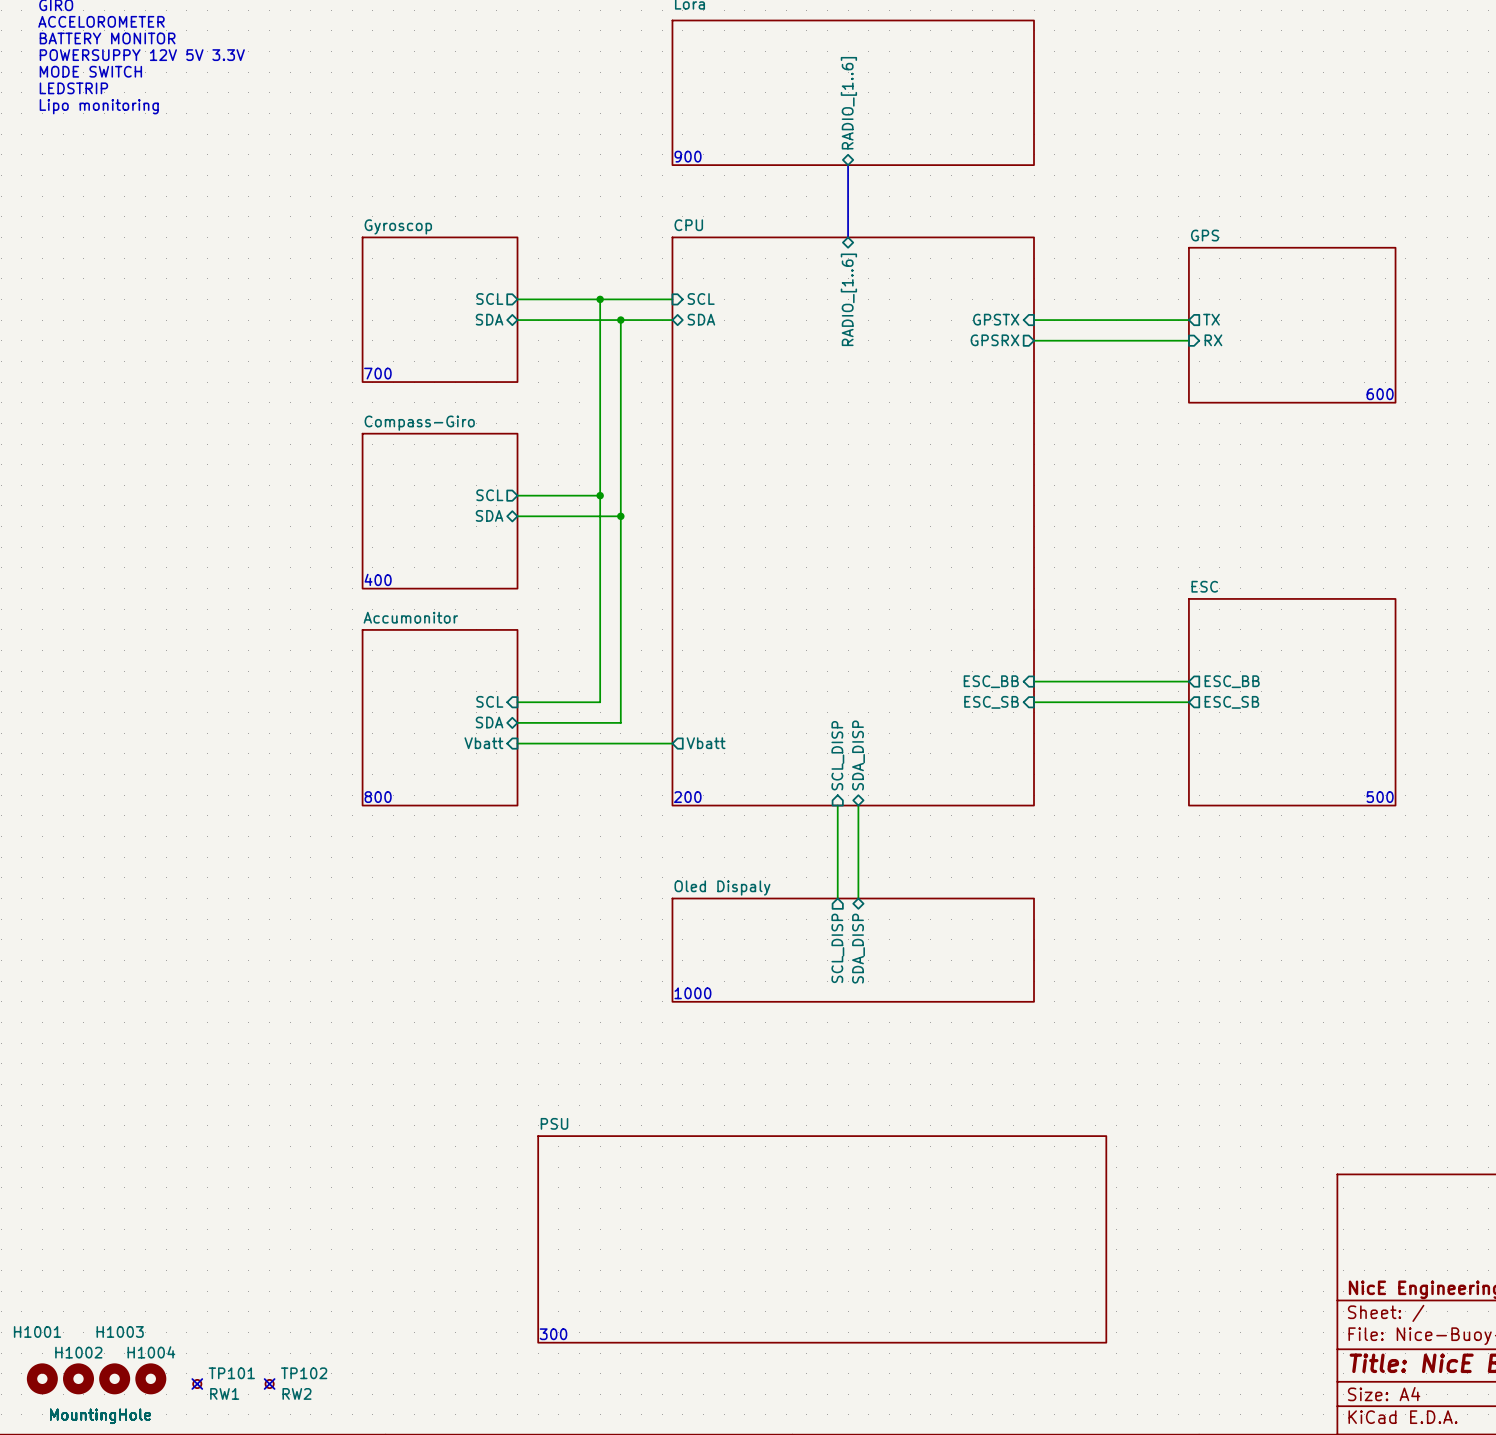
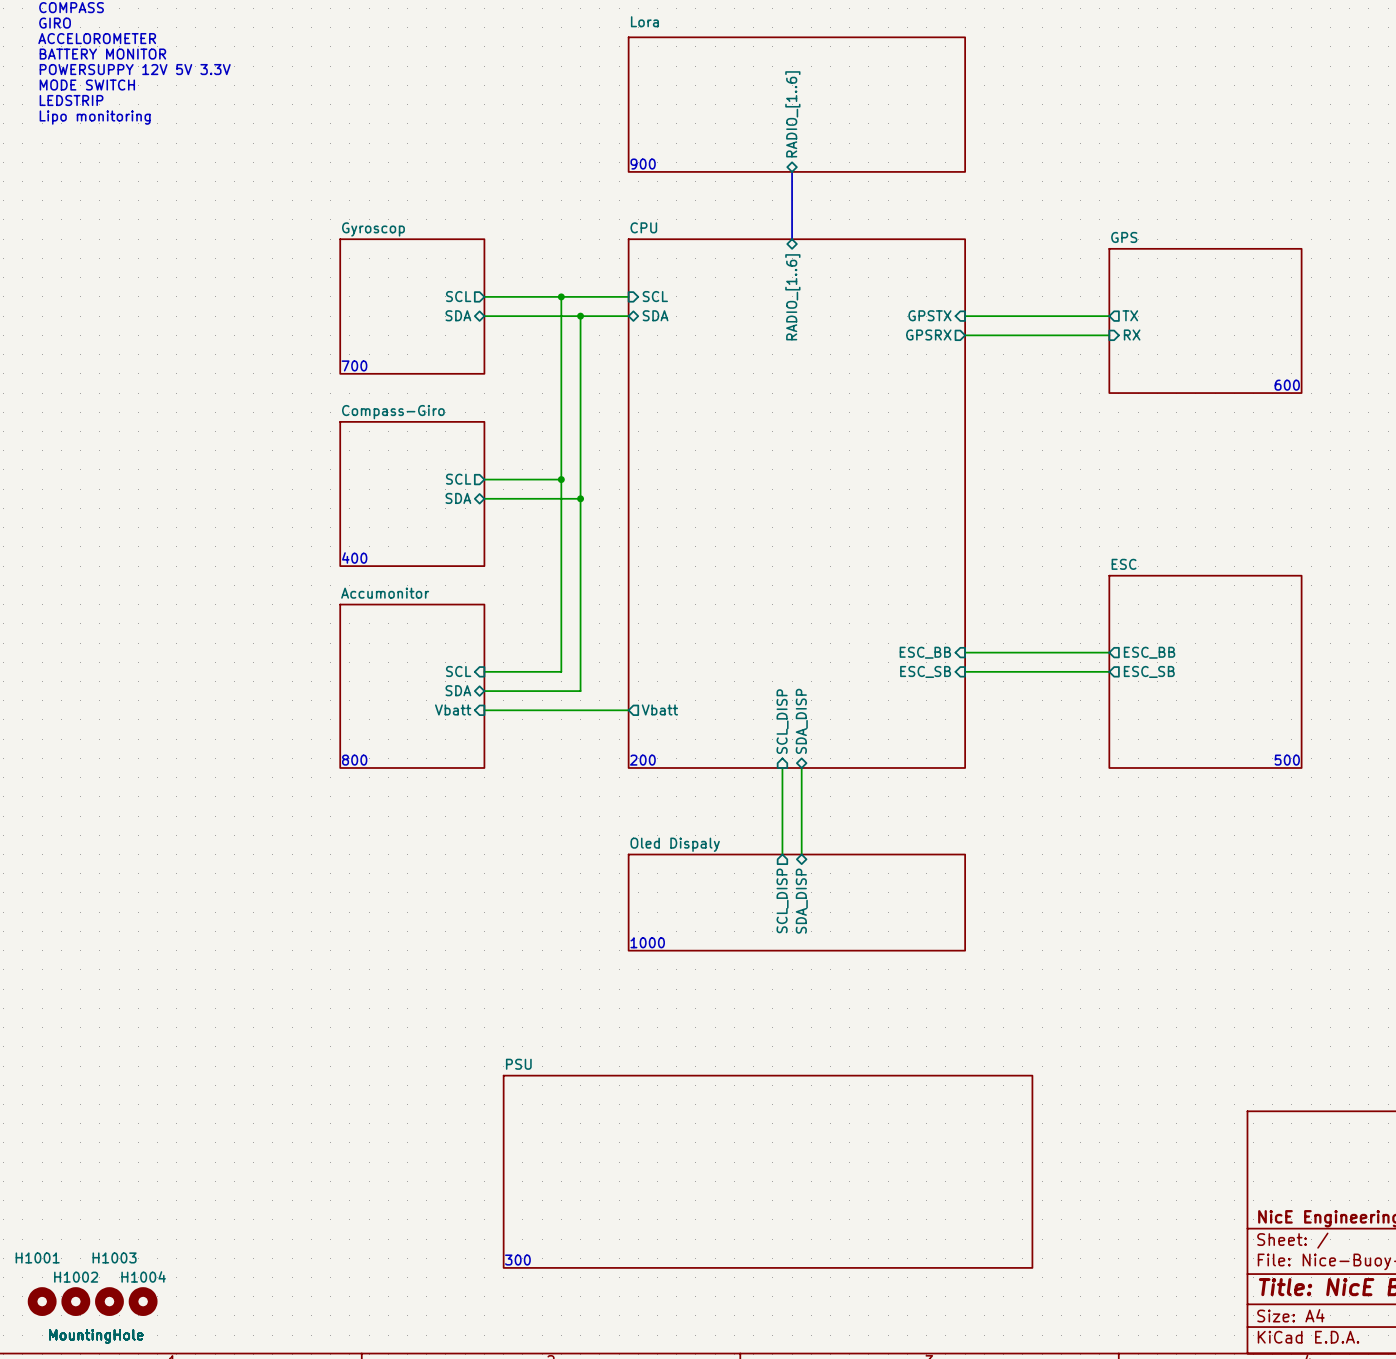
no-connect mark: (197, 1384) -> none
TP101: RW1 (197, 1384) -> none
no-connect mark: (269, 1384) -> none
TP102: RW2 (269, 1384) -> none

